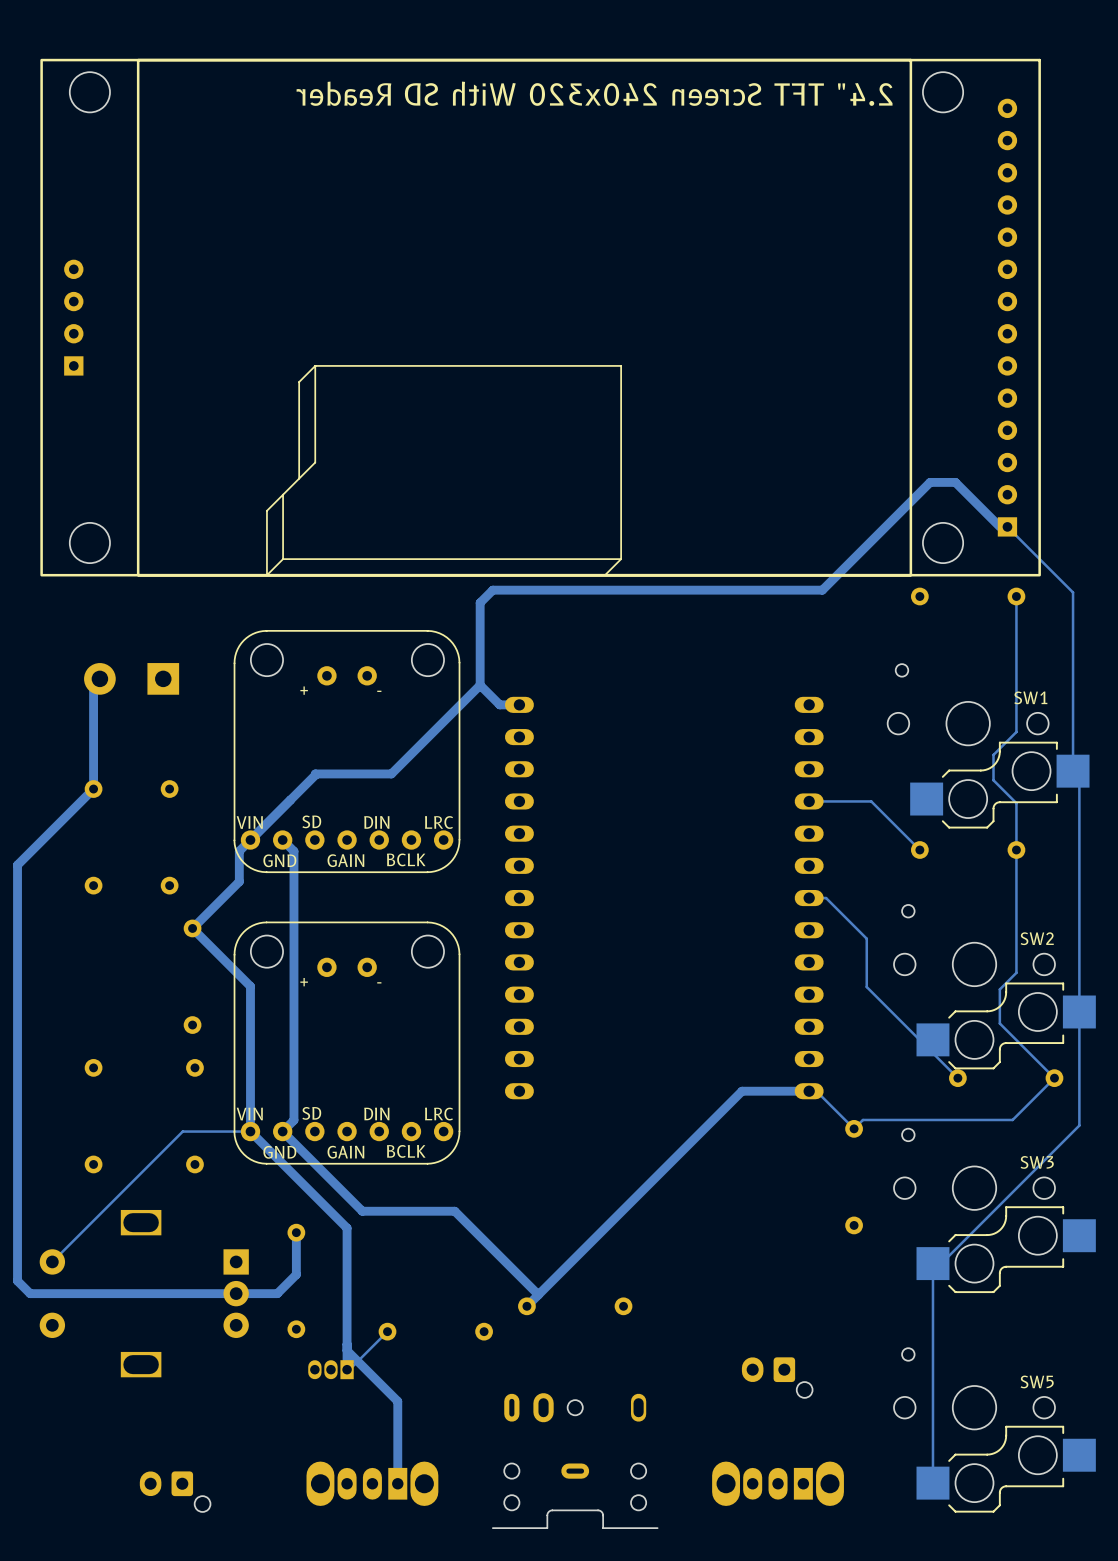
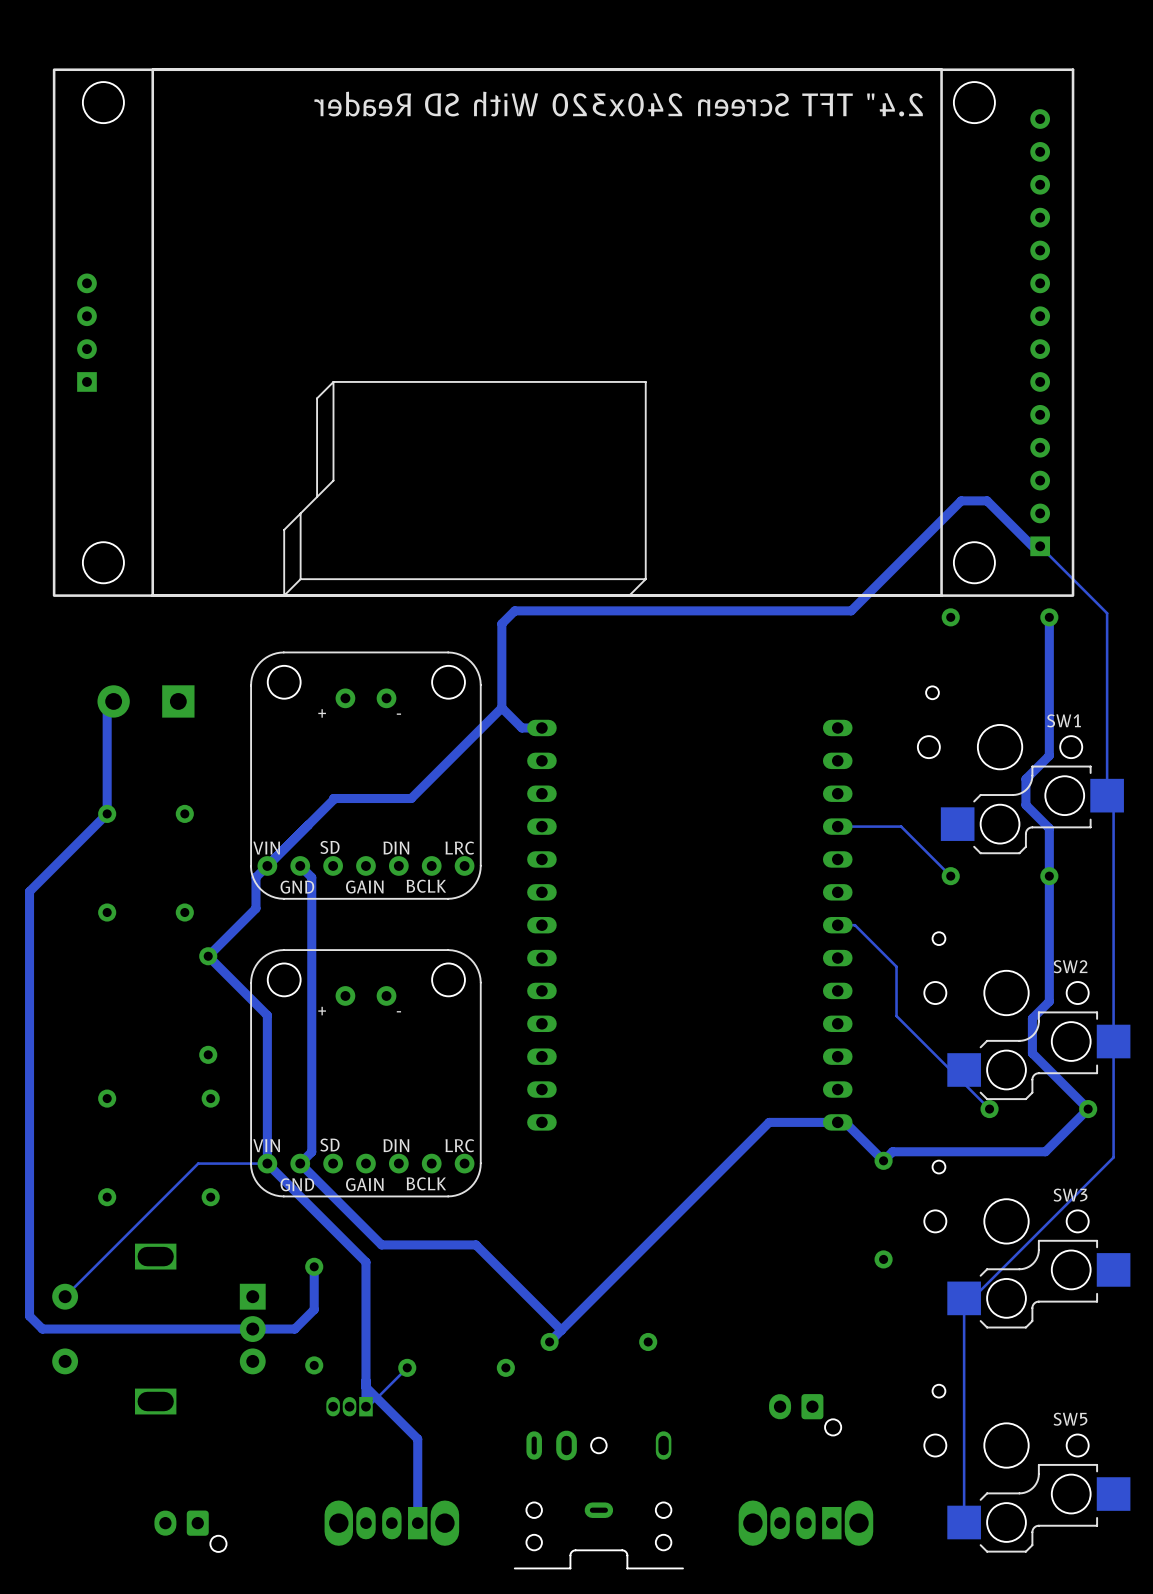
track width: thin (1016, 596) (1016, 731) (993, 754) (993, 780) (1016, 803) (1016, 972) (999, 989) (999, 1023) (1054, 1078) (1012, 1119) (862, 1119) (854, 1128) (816, 1091) -> thick (1049, 617) (1049, 755) (1025, 779) (1025, 804) (1049, 828) (1049, 1001) (1032, 1018) (1032, 1053) (1088, 1109) (1045, 1151) (892, 1151) (883, 1160) (845, 1122)

